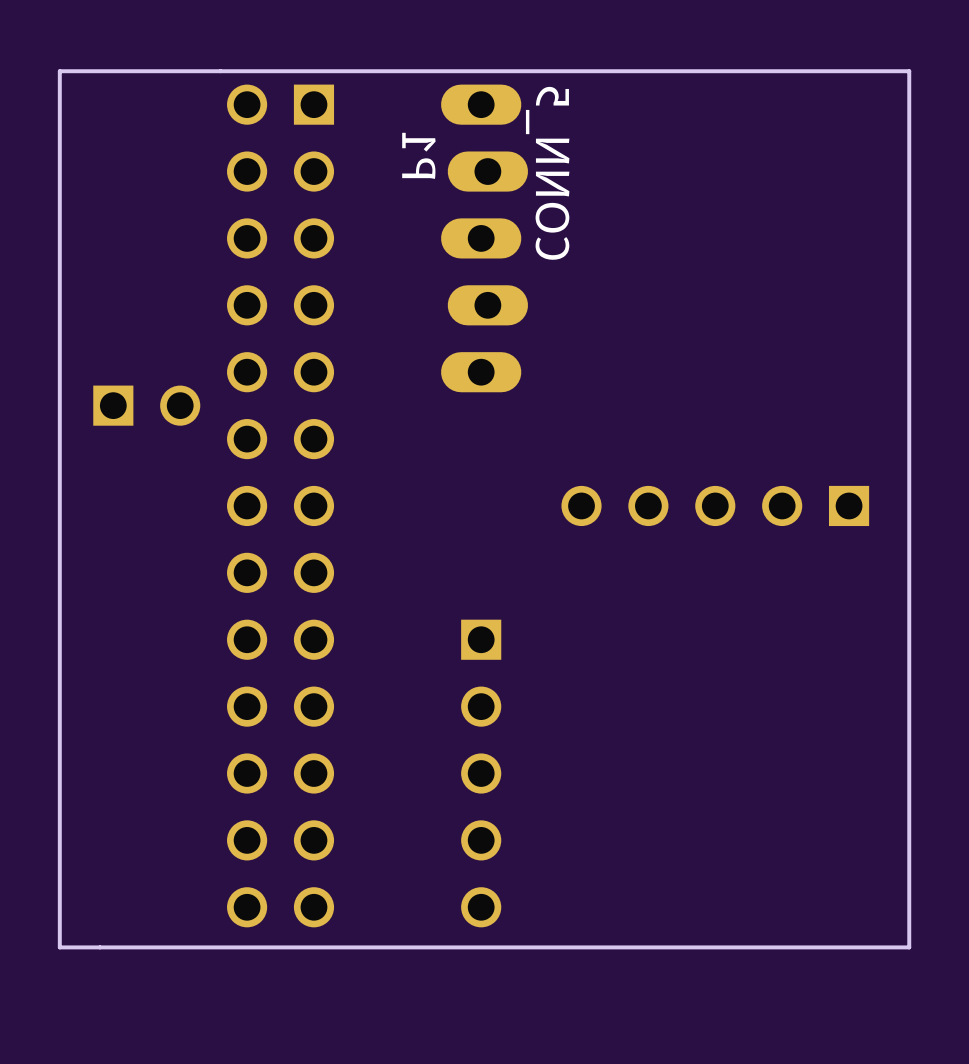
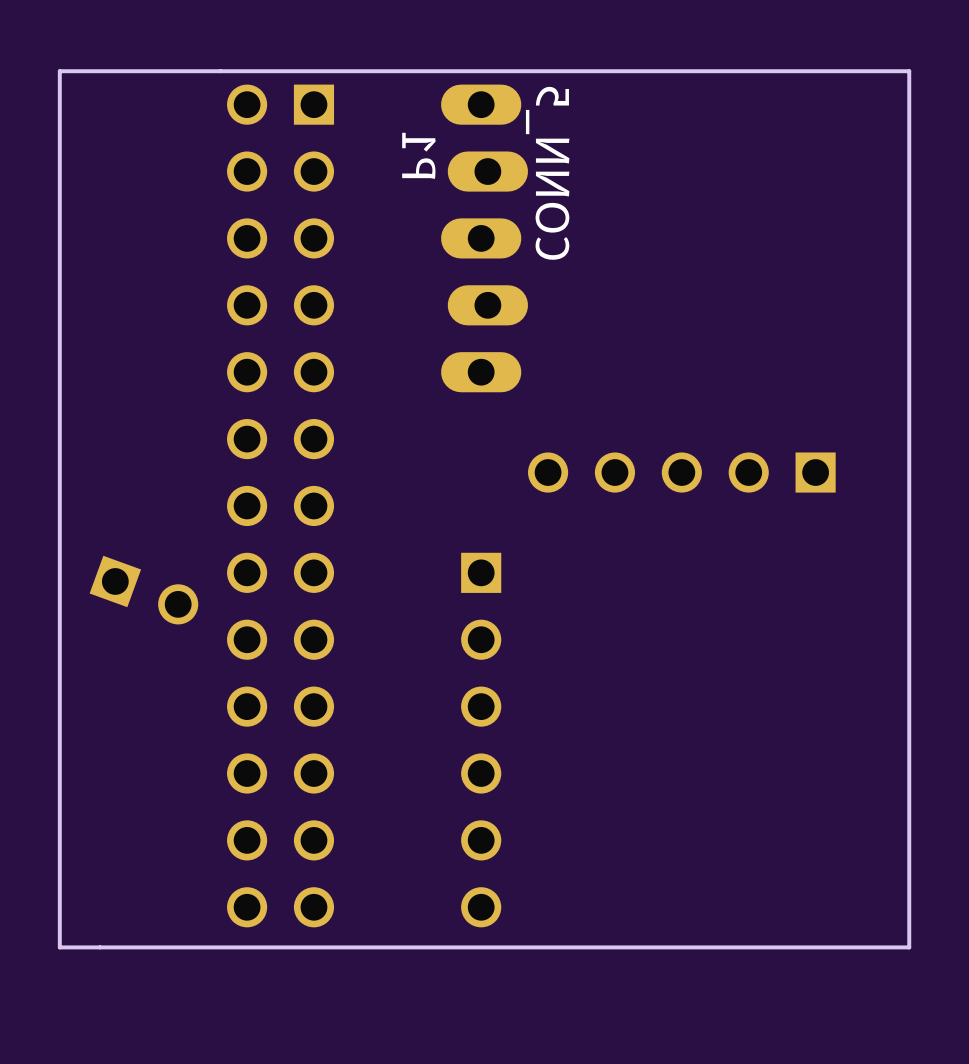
part: (146, 405) -> none
part position: (715, 505) -> (681, 472)
part: none -> (143, 590)
part: none -> (481, 740)
part: (481, 773) -> none

